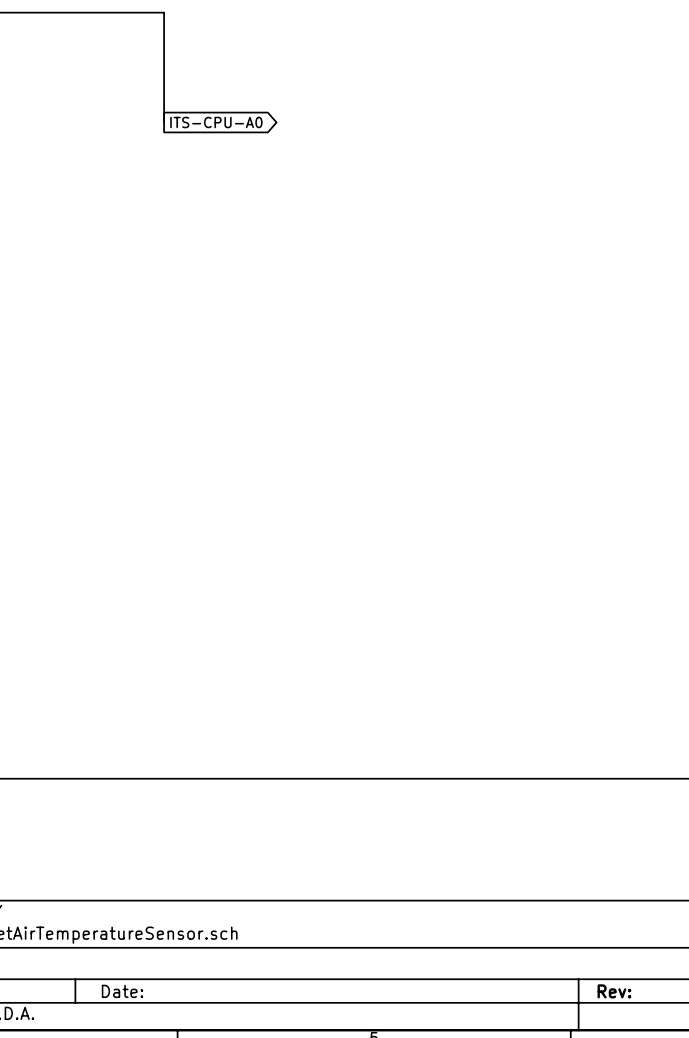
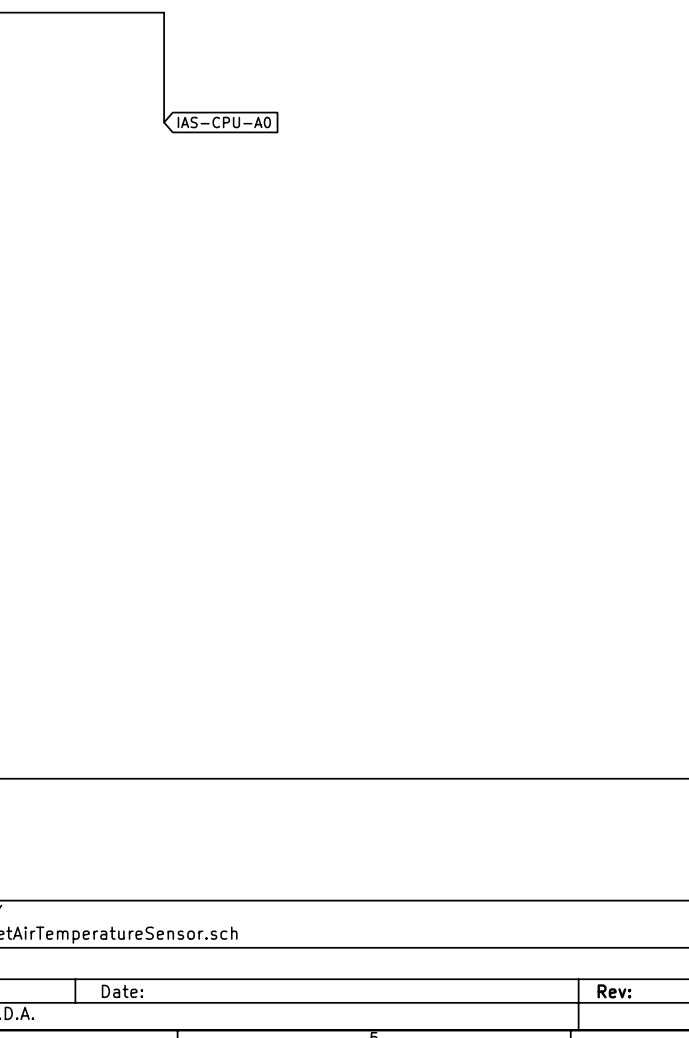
global label shape: output (216, 122) -> input (224, 122)
global label: ITS-CPU-A0 (216, 122) -> IAS-CPU-A0 (224, 122)

